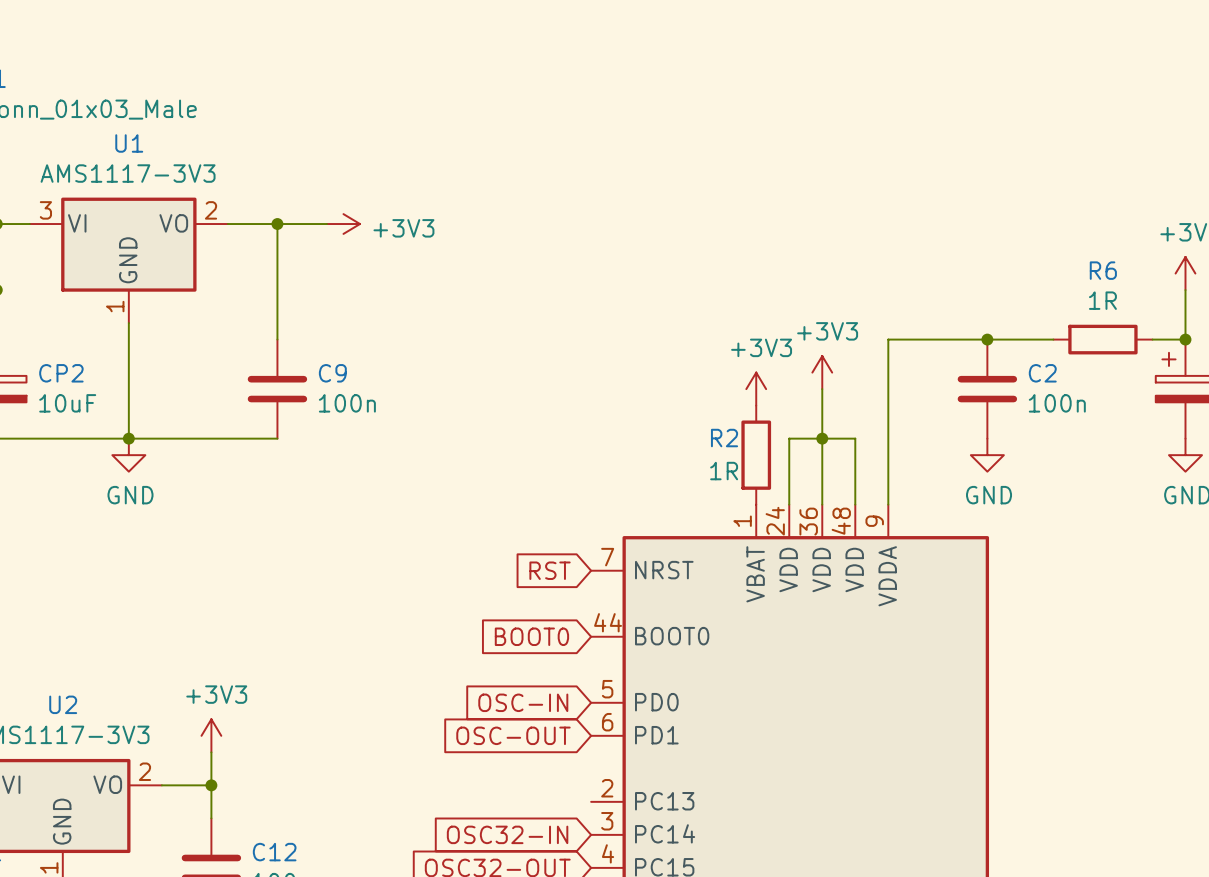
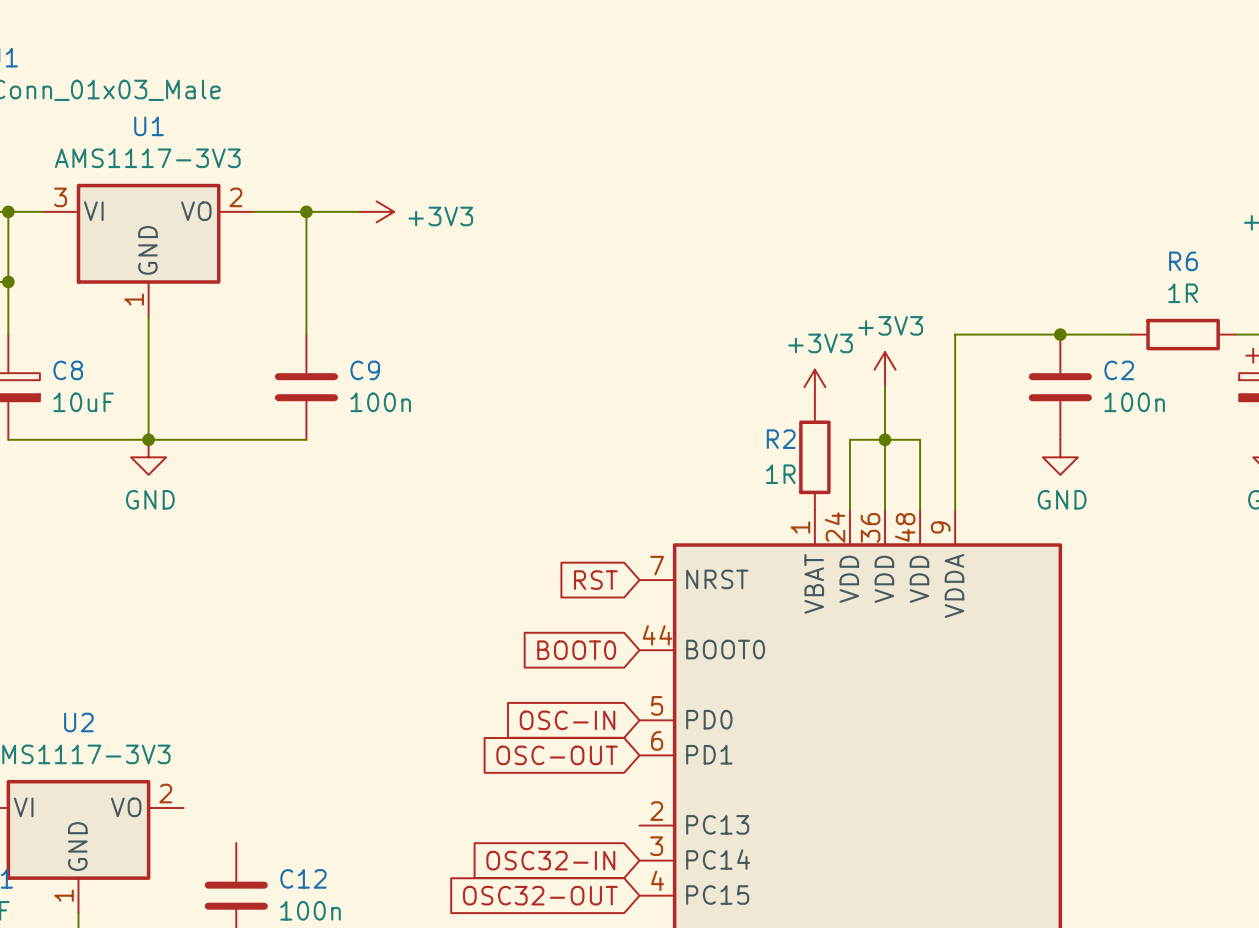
CP2 name: CP2 (61, 373) -> C8 (68, 370)
power symbol: +3V3 (211, 735) -> none
wire: (211, 752) (211, 818) -> none
wire: (161, 785) (211, 785) -> none
junction: (211, 785) -> none

